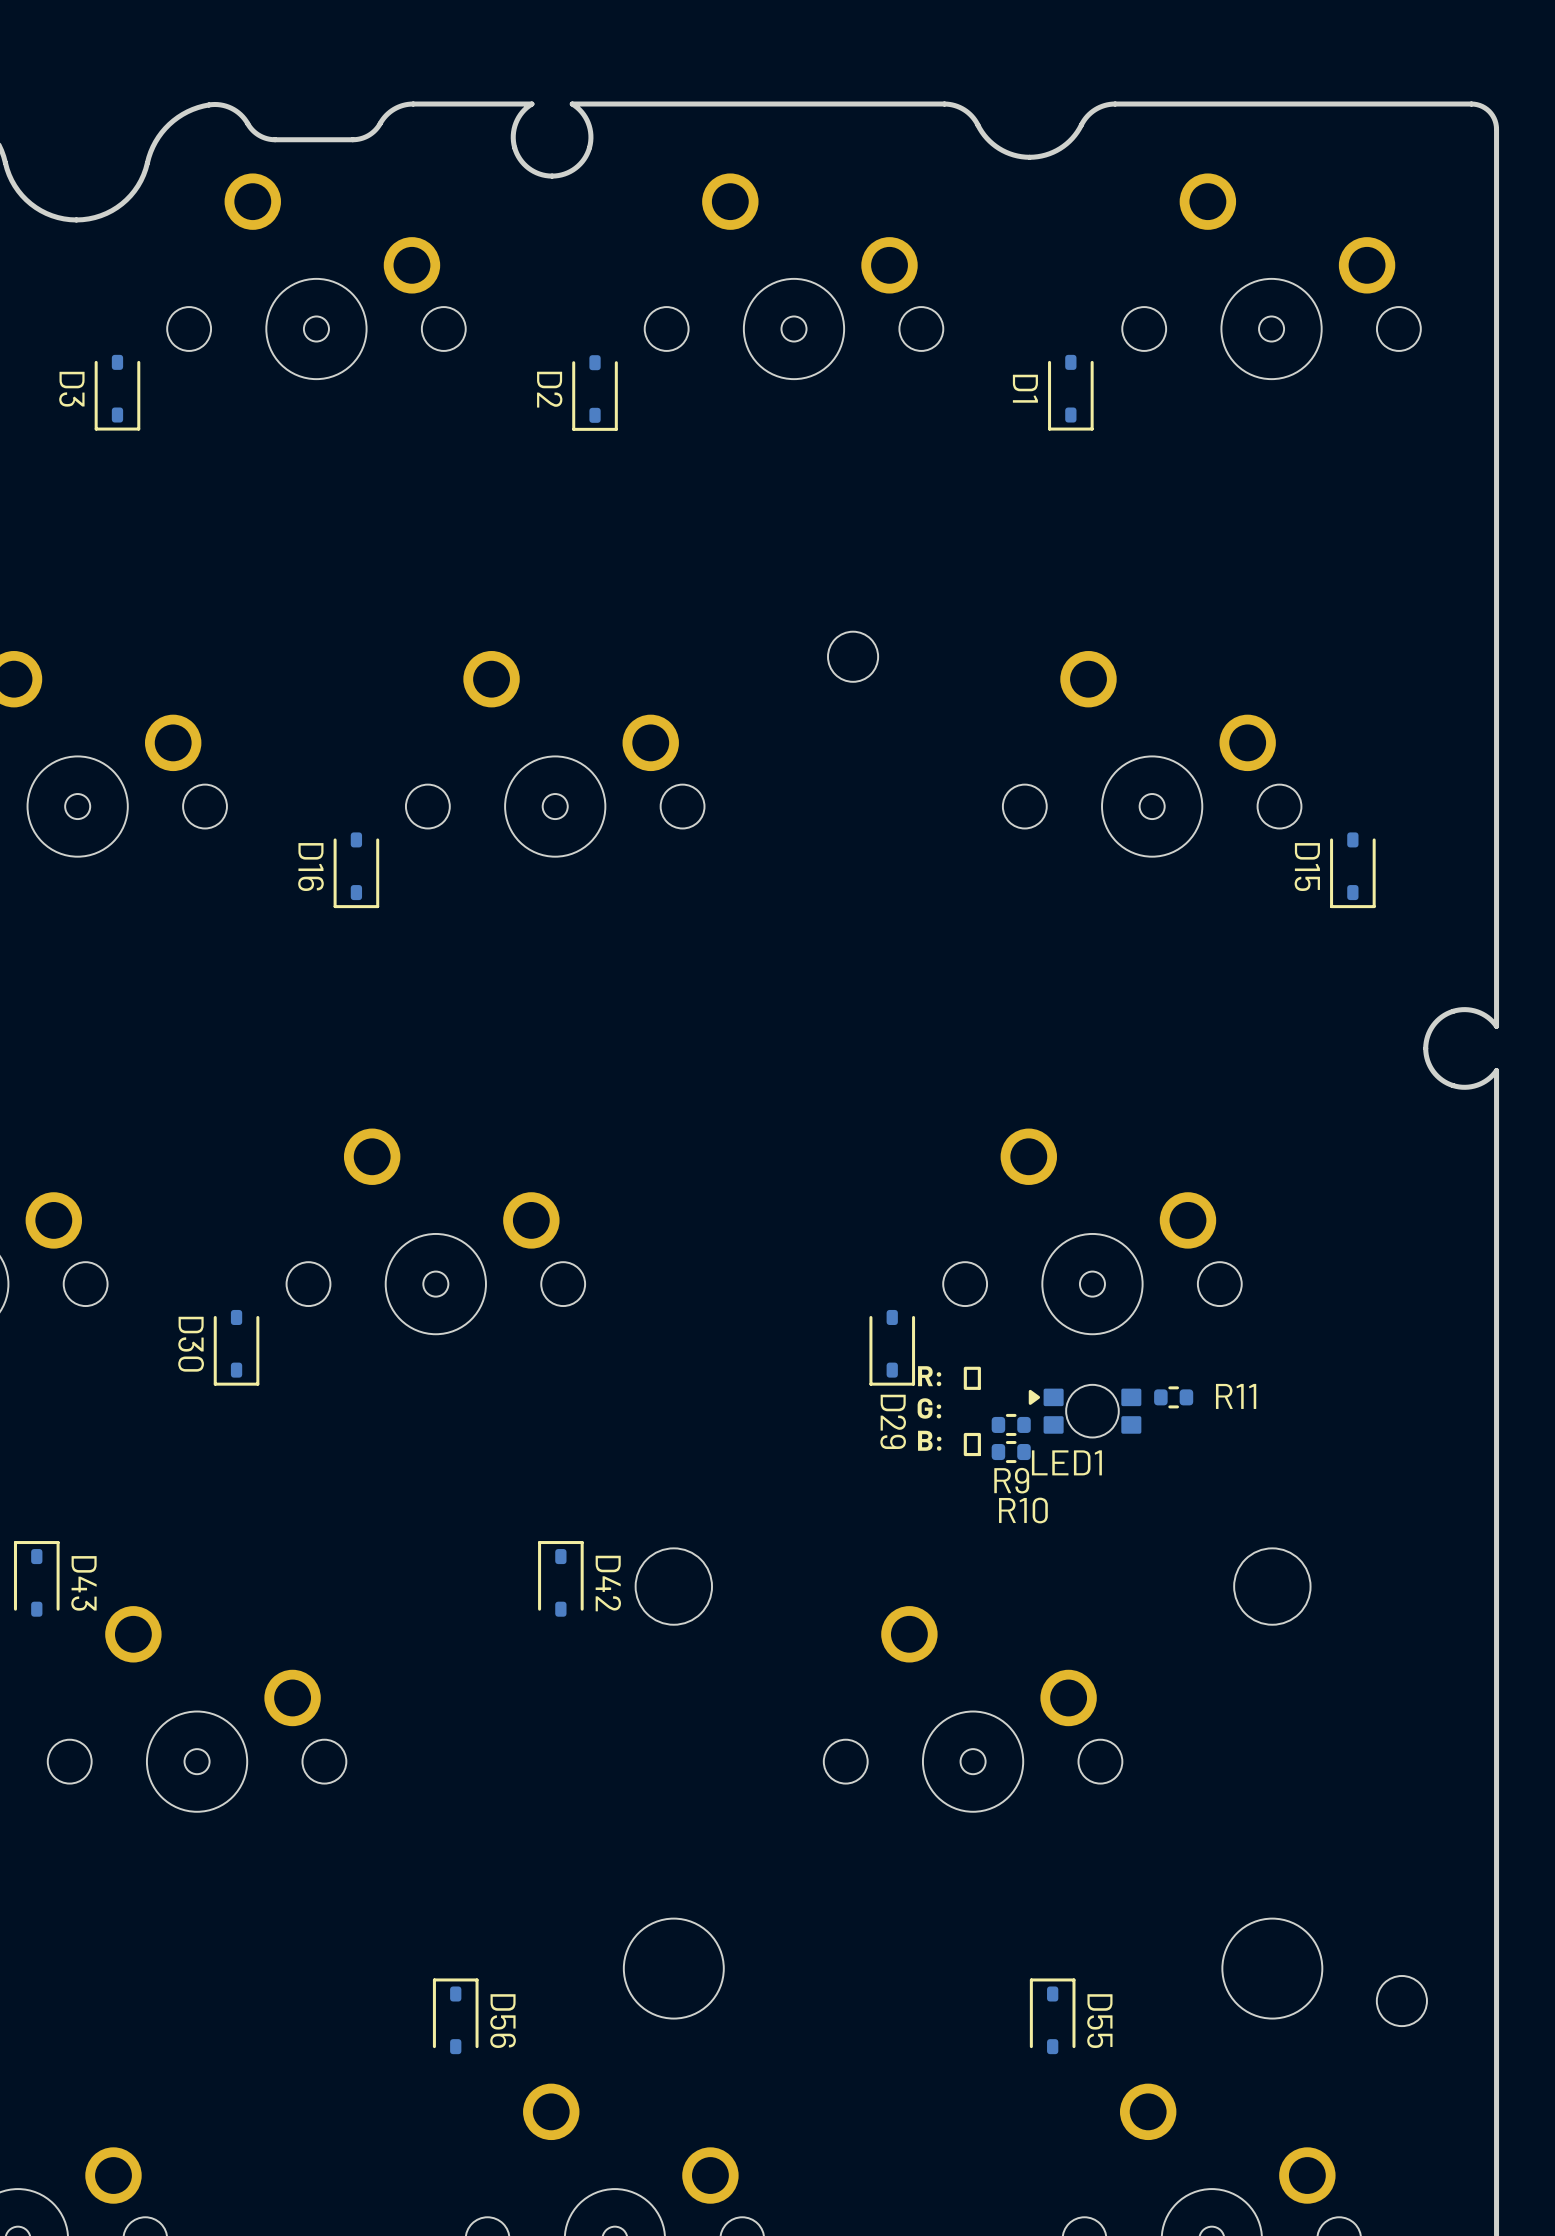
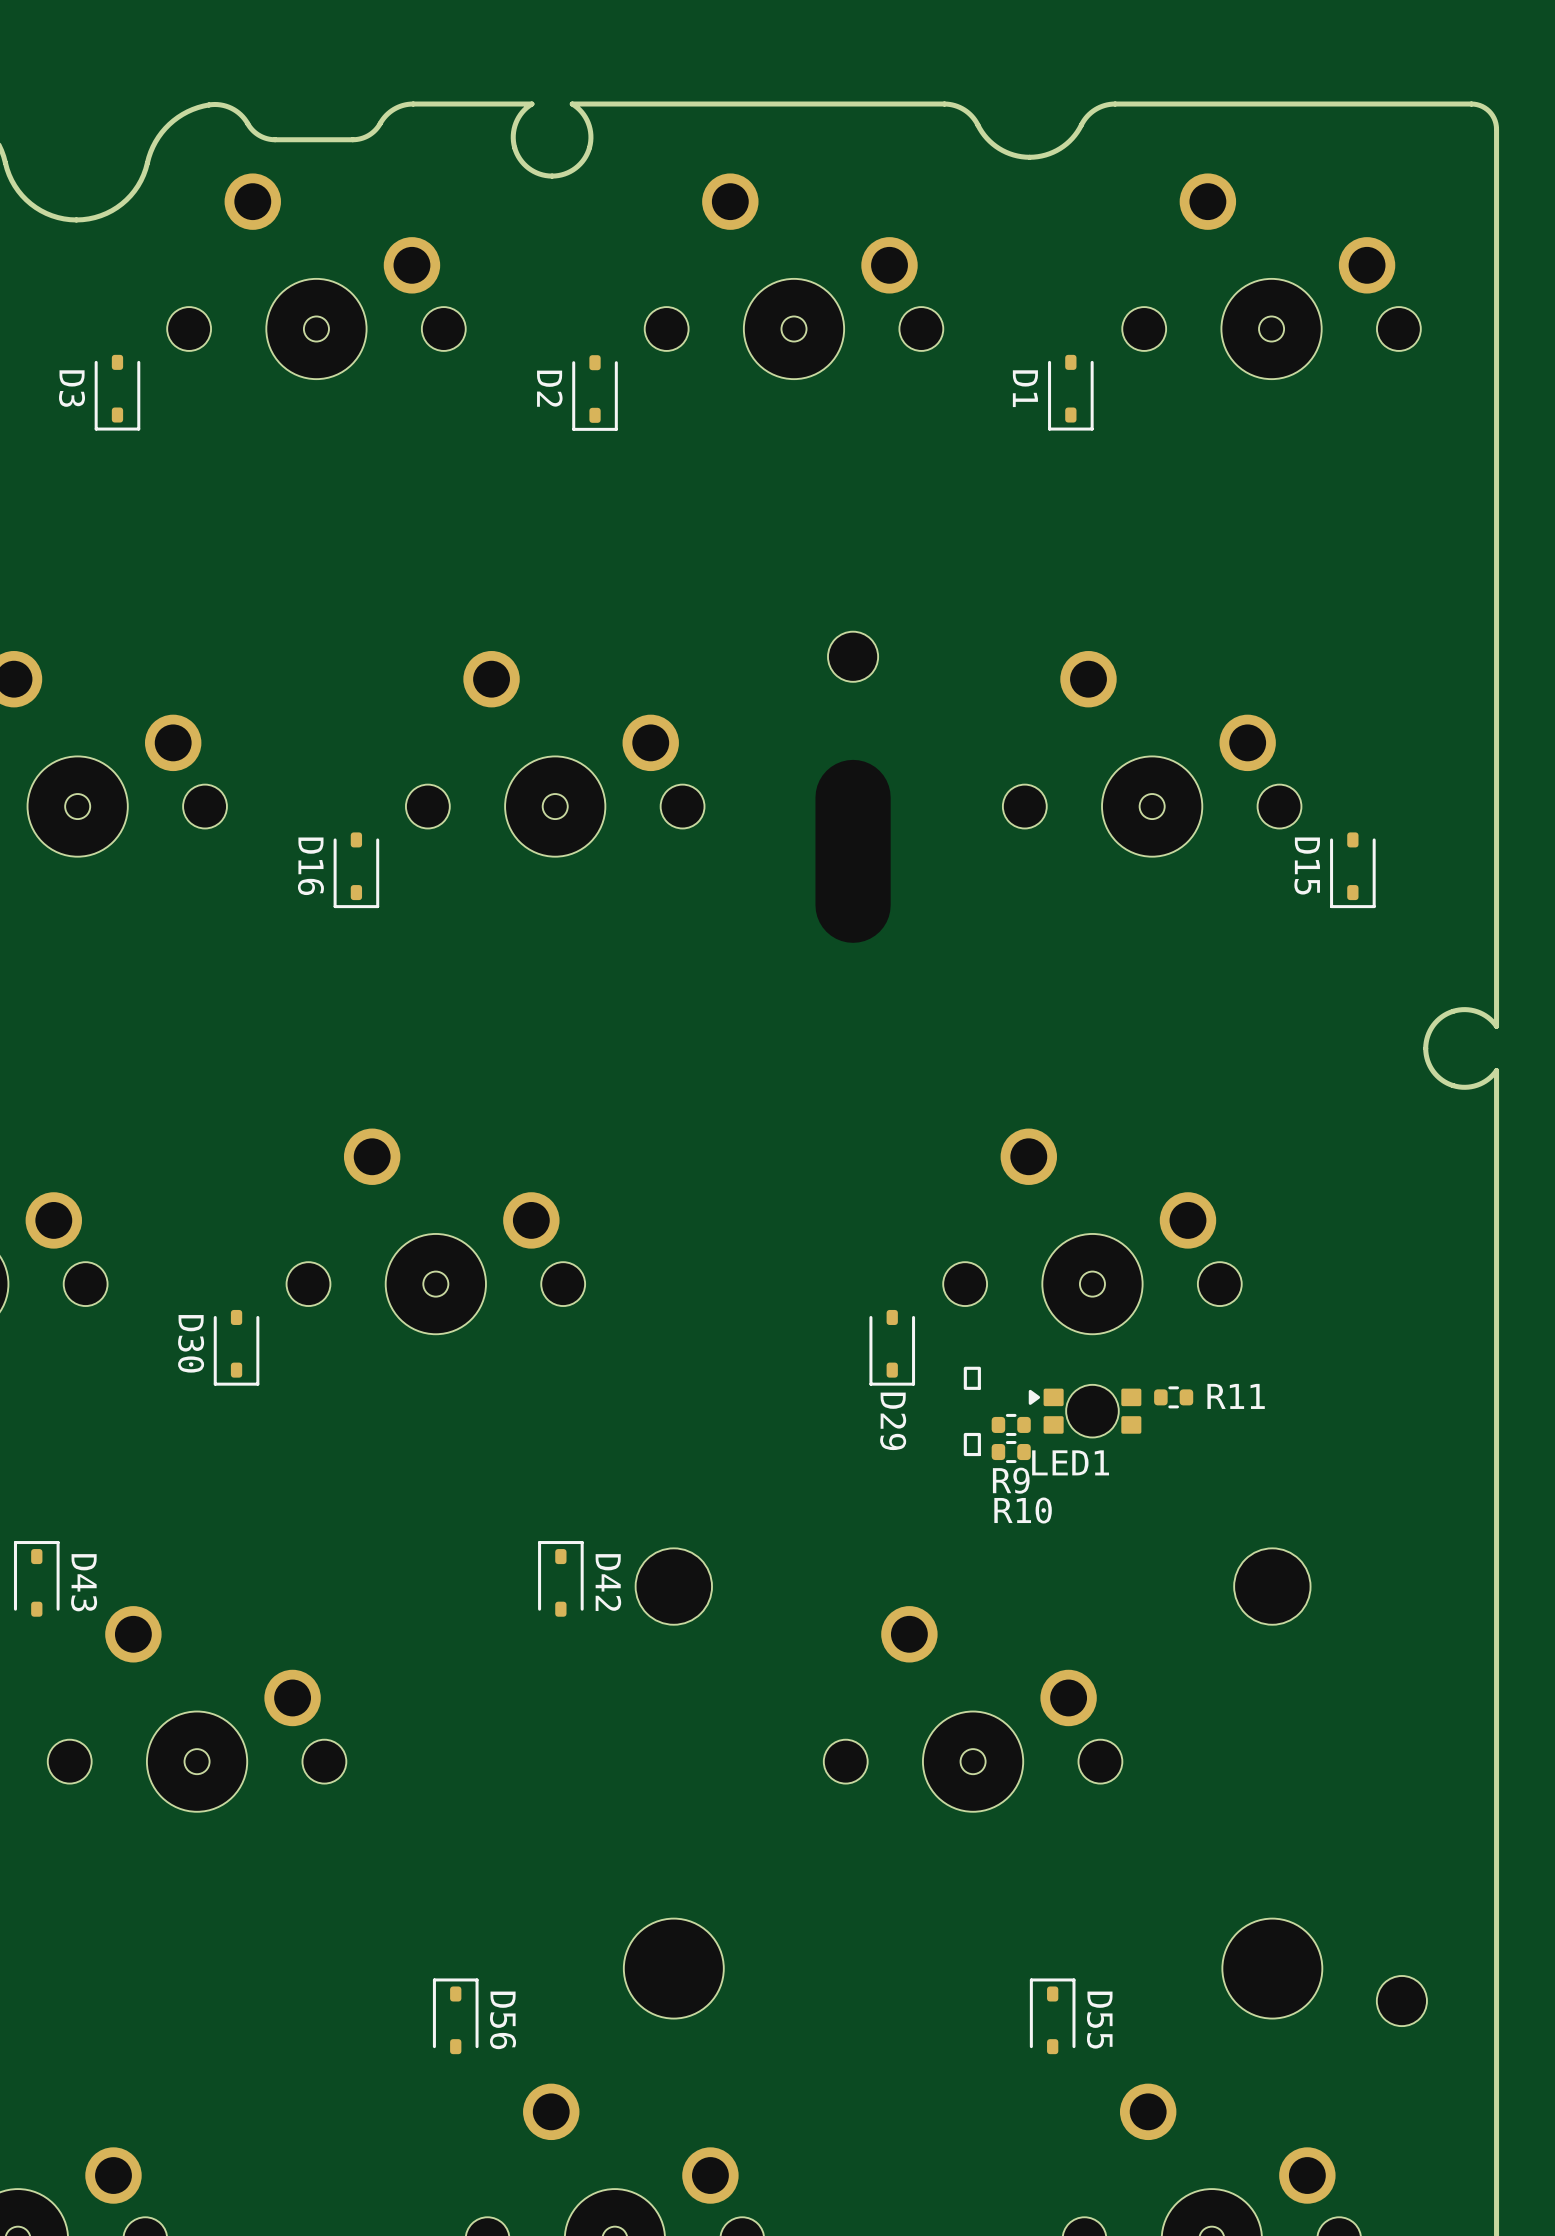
text: R: (929, 1376) -> none
text: G: (929, 1408) -> none
text: B: (929, 1440) -> none

